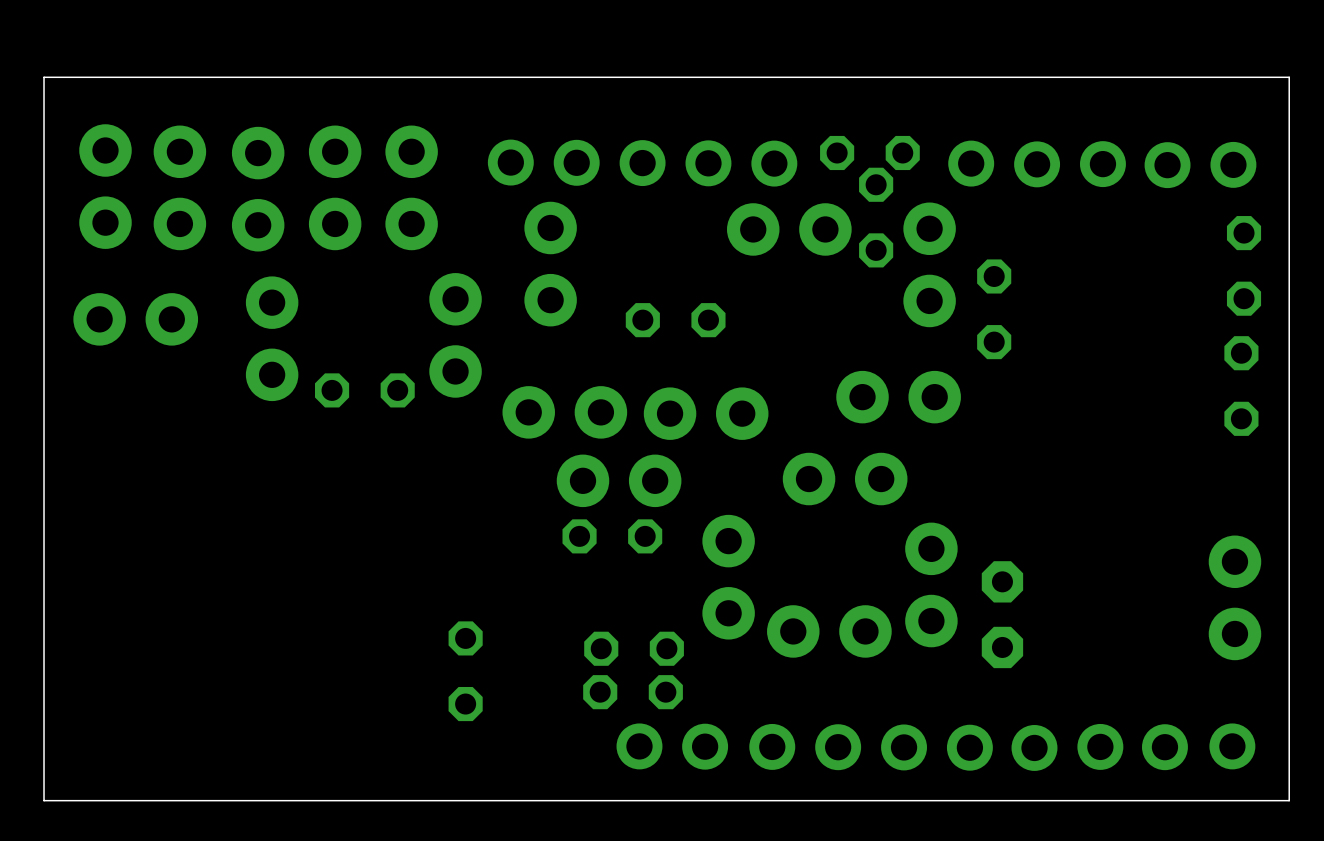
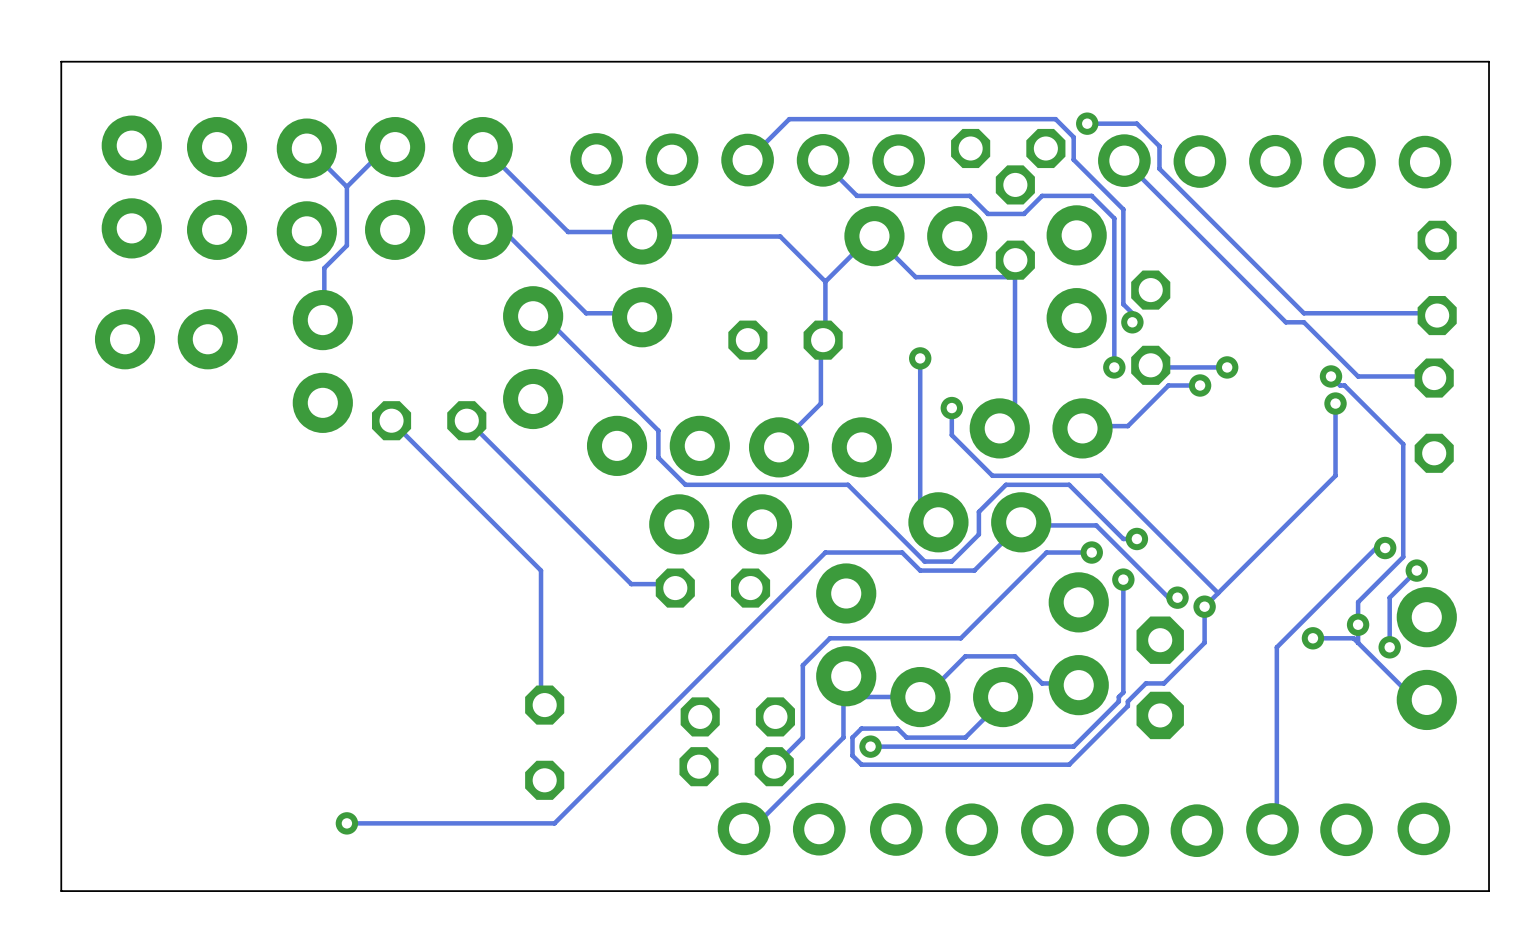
track: none -> (1087, 123) (1136, 123) (1159, 146) (1159, 168) (1303, 313) (1434, 313) (1437, 315)
via: none -> (1087, 123)
track: none -> (395, 147) (392, 150) (383, 150) (346, 186)
track: none -> (482, 147) (568, 232) (640, 232) (644, 236) (780, 236) (825, 281)
track: none -> (306, 148) (346, 186)
track: none -> (747, 160) (789, 119) (1055, 119) (1073, 137) (1073, 159) (1123, 209) (1123, 304) (1132, 313) (1132, 322)
track: none -> (823, 160) (857, 195) (969, 195) (987, 213) (1024, 213) (1042, 195) (1091, 195) (1114, 218) (1114, 367)
track: none -> (1124, 160) (1285, 322) (1303, 322) (1358, 376) (1430, 376) (1434, 378)
track: none -> (346, 186) (346, 245) (324, 268) (322, 320)
track: none -> (482, 229) (486, 232) (504, 232) (586, 313) (640, 313) (642, 317)
track: none -> (825, 281) (825, 335) (820, 340) (820, 403) (779, 447)
track: none -> (825, 281) (870, 236) (875, 236) (915, 277) (1015, 277) (1015, 260) (1015, 412) (999, 428)
track: none -> (533, 316) (545, 317) (658, 430) (658, 457) (685, 484) (847, 484) (924, 561) (951, 561) (978, 534) (978, 511) (1005, 484) (1069, 484) (1123, 538) (1136, 538)
via: none -> (1132, 322)
track: none -> (920, 358) (920, 502) (938, 522)
via: none -> (920, 358)
track: none -> (1150, 365) (1154, 367) (1227, 367)
via: none -> (1114, 367)
via: none -> (1227, 367)
track: none -> (1331, 376) (1340, 385) (1344, 385) (1403, 444) (1403, 557) (1358, 602) (1358, 642)
via: none -> (1331, 376)
track: none -> (1200, 385) (1168, 385) (1127, 426) (1082, 426) (1082, 428)
via: none -> (1200, 385)
track: none -> (1335, 403) (1335, 475) (1204, 606) (1204, 642) (1163, 683) (1145, 683) (1127, 701) (1127, 706) (1069, 764) (861, 764) (852, 755) (852, 737) (861, 728) (897, 728) (906, 737) (965, 737) (1001, 701) (1003, 697)
via: none -> (1335, 403)
track: none -> (951, 408) (951, 435) (992, 475) (1100, 475) (1218, 593)
via: none -> (951, 408)
track: none -> (391, 420) (541, 570) (541, 701) (544, 705)
track: none -> (466, 420) (631, 584) (671, 584) (675, 588)
via: none -> (1136, 538)
track: none -> (1385, 548) (1376, 548) (1276, 647) (1276, 827) (1272, 829)
via: none -> (1385, 548)
track: none -> (1091, 552) (1046, 552) (960, 638) (829, 638) (802, 665) (802, 737) (774, 766)
via: none -> (1091, 552)
track: none -> (1416, 570) (1389, 597) (1389, 647)
via: none -> (1416, 570)
track: none -> (1123, 579) (1123, 692) (1118, 696) (1118, 701) (1073, 746) (870, 746)
via: none -> (1123, 579)
track: none -> (1177, 597) (1168, 597) (1096, 525) (1024, 525) (1021, 522) (974, 570) (920, 570) (902, 552) (825, 552) (554, 823) (346, 823)
via: none -> (1177, 597)
via: none -> (1204, 606)
via: none -> (1358, 624)
track: none -> (1312, 638) (1353, 638) (1412, 696) (1425, 696) (1426, 699)
via: none -> (1312, 638)
via: none -> (1389, 647)
track: none -> (1078, 685) (1078, 683) (1042, 683) (1015, 656) (965, 656) (924, 696) (920, 697) (843, 696) (846, 676) (843, 678) (843, 737) (753, 827) (744, 828)
via: none -> (870, 746)
via: none -> (346, 823)

